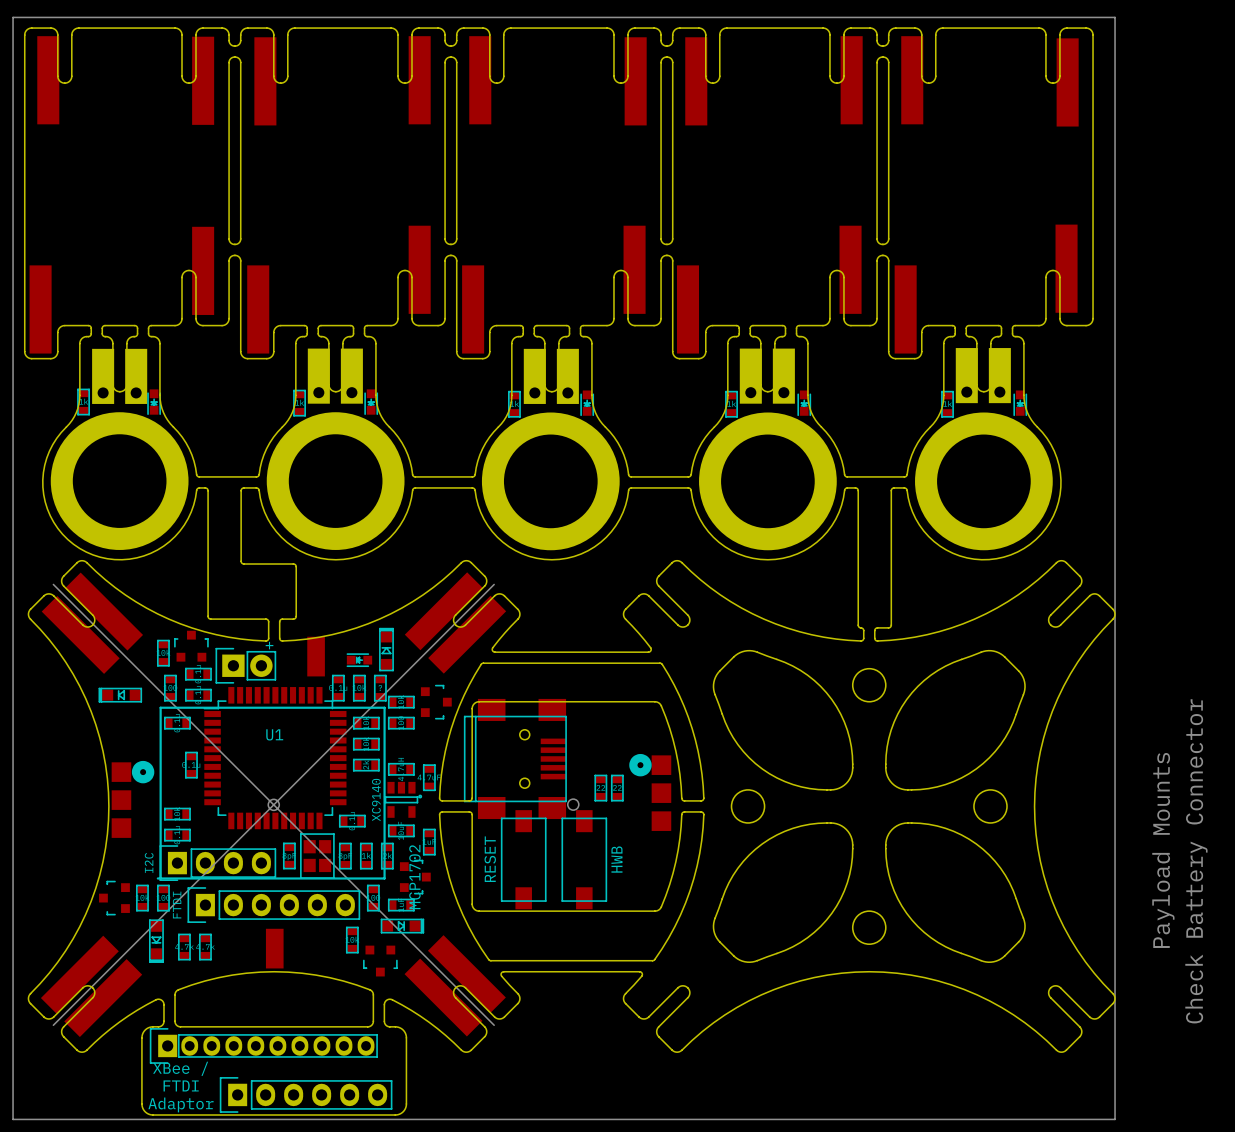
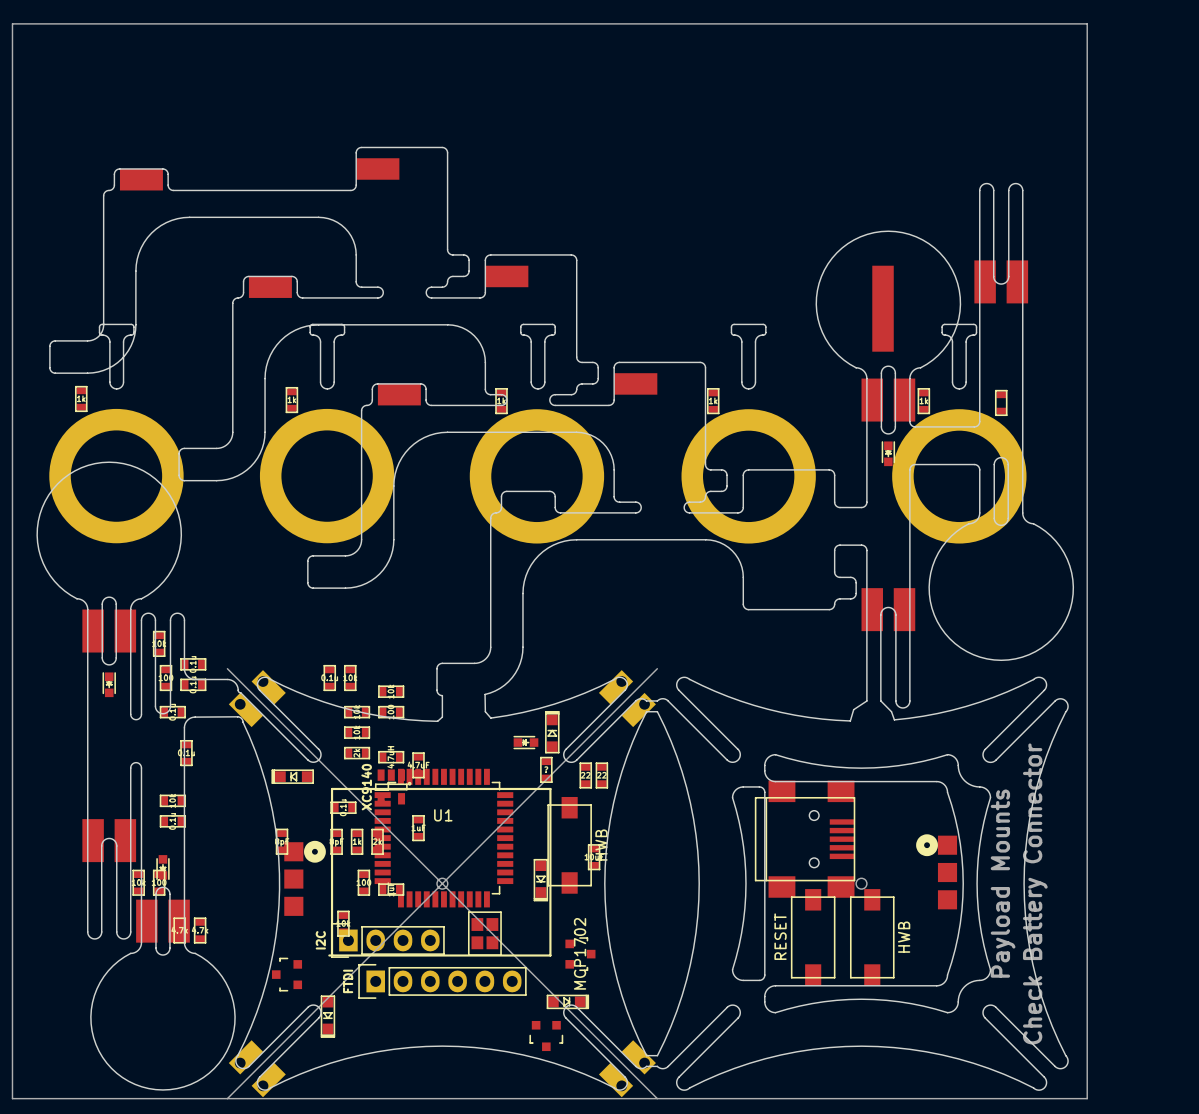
board edge: (31, 28) (51, 28) (56, 31) (57, 77) (60, 81) (64, 83) (71, 77) (71, 34) (74, 29) (78, 28) (178, 28) (181, 34) (182, 77) (184, 81) (189, 83) (195, 77) (196, 34) (198, 30) (202, 28) (225, 28) (228, 33) (229, 43) (234, 46) (240, 43) (241, 32) (245, 28) (271, 29) (273, 35) (273, 77) (276, 81) (280, 83) (287, 77) (287, 34) (289, 30) (294, 28) (394, 28) (397, 34) (398, 77) (400, 81) (404, 83) (411, 77) (412, 34) (418, 28) (441, 28) (444, 33) (445, 43) (450, 46) (455, 43) (457, 32) (461, 28) (487, 29) (489, 35) (489, 77) (492, 81) (496, 83) (503, 77) (503, 34) (509, 28) (610, 28) (613, 34) (614, 77) (616, 81) (620, 83) (627, 77) (628, 34) (634, 28) (657, 28) (660, 33) (661, 43) (666, 46) (671, 43) (673, 32) (677, 28) (703, 29) (705, 35) (705, 77) (708, 81) (712, 83) (719, 77) (719, 34) (725, 28) (826, 28) (829, 34) (830, 77) (832, 81) (836, 83) (843, 77) (844, 34) (849, 28) (873, 28) (876, 33) (877, 43) (882, 46) (887, 43) (889, 32) (893, 28) (919, 29) (921, 35) (921, 77) (923, 81) (928, 83) (935, 77) (935, 34) (940, 28) (1041, 28) (1045, 34) (1046, 77) (1052, 83) (1057, 81) (1059, 77) (1061, 30) (1066, 28) (1086, 28) (1090, 30) (1093, 35) (1092, 320) (1086, 325) (1066, 325) (1061, 322) (1059, 276) (1057, 271) (1052, 270) (1046, 276) (1044, 322) (1039, 325) (1014, 325) (1012, 327) (1013, 335) (1020, 337) (1023, 342) (1023, 395) (1025, 408) (1031, 420) (1050, 444) (1059, 465) (1060, 487) (1056, 509) (1041, 534) (1024, 548) (996, 558) (974, 559) (952, 553) (934, 541) (915, 518) (906, 488) (892, 488) (891, 625) (888, 627) (875, 628) (874, 638) (877, 641) (914, 637) (939, 631) (974, 619) (1018, 594) (1060, 560) (1065, 562) (1079, 576) (1081, 582) (1050, 615) (1048, 620) (1050, 625) (1054, 626) (1059, 625) (1092, 594) (1098, 595) (1113, 610) (1113, 618) (1094, 639) (1070, 673) (1052, 711) (1040, 751) (1034, 806) (1040, 861) (1052, 901) (1077, 950) (1113, 994) (1114, 999) (1112, 1003) (1098, 1017) (1092, 1018) (1059, 987) (1054, 985) (1050, 987) (1048, 991) (1050, 997) (1081, 1030) (1079, 1036) (1065, 1050) (1060, 1052) (1013, 1014) (964, 989) (924, 977) (896, 973) (841, 973) (800, 980) (761, 994) (724, 1014) (677, 1052) (672, 1050) (658, 1036) (656, 1030) (688, 996) (689, 991) (685, 986) (678, 987) (648, 1016) (643, 1018) (625, 1003) (623, 998) (625, 994) (641, 976) (640, 971) (503, 971) (501, 976) (518, 994) (519, 998) (518, 1002) (502, 1018) (495, 1017) (464, 986) (457, 986) (454, 990) (455, 997) (486, 1029) (485, 1036) (467, 1051) (461, 1050) (437, 1028) (411, 1010) (391, 999) (385, 1001) (385, 1024) (388, 1026) (400, 1028) (406, 1036) (406, 1105) (399, 1114) (152, 1115) (145, 1111) (141, 1103) (142, 1036) (147, 1028) (159, 1026) (163, 1024) (162, 1000) (156, 999) (137, 1010) (82, 1052) (77, 1050) (63, 1036) (61, 1030) (93, 997) (94, 991) (92, 987) (87, 985) (83, 987) (49, 1018) (43, 1016) (28, 1000) (30, 994) (65, 950) (91, 901) (105, 847) (108, 806) (103, 751) (91, 711) (65, 662) (30, 618) (28, 612) (43, 595) (49, 593) (83, 625) (87, 627) (92, 625) (94, 620) (93, 615) (61, 582) (63, 576) (77, 562) (82, 560) (135, 601) (157, 613) (192, 628) (228, 637) (266, 641) (268, 638) (268, 621) (266, 619) (210, 619) (208, 617) (206, 488) (197, 489) (188, 518) (169, 541) (150, 553) (129, 559) (107, 558) (79, 548) (62, 534) (47, 509) (42, 487) (44, 465) (52, 444) (72, 420) (77, 408) (79, 395) (79, 342) (83, 337) (90, 335) (91, 328) (88, 325) (60, 327) (57, 331) (57, 353) (53, 358) (30, 358) (25, 354) (24, 35) (26, 30) (31, 28) -> none
board edge: (234, 57) (239, 58) (240, 62) (240, 238) (239, 242) (235, 244) (230, 242) (229, 238) (229, 62) (230, 58) (234, 57) -> none
board edge: (450, 57) (455, 58) (456, 62) (456, 238) (455, 242) (451, 244) (446, 242) (445, 238) (445, 62) (446, 58) (450, 57) -> none
board edge: (666, 57) (671, 58) (672, 62) (672, 238) (671, 242) (667, 244) (662, 242) (661, 238) (661, 62) (662, 58) (666, 57) -> none
board edge: (882, 57) (887, 58) (888, 62) (888, 238) (887, 242) (883, 244) (878, 242) (877, 238) (877, 62) (878, 58) (882, 57) -> none
part: (48, 80) -> none
part: (203, 80) -> none
part: (419, 80) -> none
part: (480, 80) -> none
part: (851, 80) -> none
part: (912, 80) -> none
part: (265, 81) -> none
part: (635, 81) -> none
part: (696, 81) -> none
part: (1067, 82) -> none
part: none -> (377, 168)
part: none -> (141, 179)
board edge: (234, 255) (238, 256) (240, 260) (240, 351) (242, 356) (247, 358) (271, 357) (273, 352) (274, 330) (278, 326) (305, 325) (307, 334) (298, 338) (295, 342) (295, 395) (293, 408) (288, 420) (266, 448) (258, 475) (199, 476) (196, 475) (189, 448) (167, 420) (161, 408) (159, 395) (159, 342) (156, 337) (149, 335) (148, 327) (150, 325) (175, 325) (180, 322) (182, 276) (184, 271) (189, 270) (193, 271) (195, 276) (197, 322) (202, 325) (226, 324) (229, 318) (229, 260) (234, 255) -> none
board edge: (450, 255) (454, 256) (456, 260) (456, 351) (458, 356) (463, 358) (487, 357) (489, 352) (490, 330) (494, 326) (521, 325) (523, 334) (514, 338) (511, 342) (511, 395) (509, 408) (504, 420) (482, 448) (474, 475) (415, 476) (412, 475) (405, 448) (383, 420) (377, 408) (375, 395) (375, 342) (372, 337) (365, 335) (364, 327) (366, 325) (391, 325) (396, 322) (398, 276) (400, 271) (404, 270) (409, 271) (411, 276) (413, 322) (418, 325) (442, 324) (445, 318) (445, 260) (450, 255) -> none
board edge: (666, 255) (670, 256) (672, 260) (672, 351) (674, 356) (679, 358) (703, 357) (705, 352) (706, 330) (710, 326) (737, 325) (739, 334) (730, 338) (727, 342) (727, 395) (725, 408) (720, 420) (698, 448) (690, 475) (631, 476) (628, 475) (621, 448) (599, 420) (593, 408) (591, 395) (591, 342) (588, 337) (581, 335) (580, 327) (582, 325) (607, 325) (612, 322) (614, 276) (616, 271) (620, 270) (625, 271) (627, 276) (629, 322) (634, 325) (658, 324) (661, 318) (661, 260) (666, 255) -> none
board edge: (882, 255) (886, 256) (888, 260) (888, 351) (890, 356) (895, 358) (919, 357) (921, 352) (922, 330) (926, 326) (953, 325) (955, 334) (946, 338) (943, 342) (943, 395) (941, 408) (936, 420) (914, 448) (906, 475) (846, 476) (844, 475) (837, 448) (815, 420) (809, 408) (807, 395) (807, 342) (804, 337) (797, 335) (796, 327) (798, 325) (823, 325) (828, 322) (830, 276) (832, 271) (836, 270) (841, 271) (843, 276) (845, 322) (850, 325) (874, 324) (877, 318) (877, 260) (882, 255) -> none
part: (1066, 268) -> none
part: (419, 269) -> none
part: (634, 269) -> none
part: (850, 269) -> none
part: (203, 270) -> none
part: none -> (506, 276)
part: none -> (1001, 281)
part: none -> (270, 287)
part: (40, 309) -> none
part: (258, 309) -> none
part: (473, 309) -> none
part: (688, 309) -> none
board edge: none -> (881, 373) (881, 427) (884, 432) (889, 433) (895, 427) (895, 372) (892, 367) (887, 366) (883, 368) (881, 373)
part: (983, 375) -> none
part: (119, 376) -> none
part: (335, 376) -> none
part: (551, 376) -> none
part: (767, 376) -> none
part: none -> (635, 383)
part footprint: [1013, 390, 1028, 417] -> [994, 389, 1008, 417]
part: none -> (399, 394)
part: (154, 402) -> none
part: (371, 402) -> none
part: (587, 403) -> none
part rotation: 0° (804, 403) -> 180° (888, 453)
part position: (804, 403) -> (888, 453)
part: none -> (888, 400)
board edge: none -> (994, 464) (994, 519) (996, 523) (1002, 525) (1008, 519) (1008, 463) (1005, 459) (1000, 457) (996, 459) (994, 464)
board edge: (243, 487) (258, 488) (267, 519) (287, 542) (306, 553) (335, 559) (365, 553) (390, 537) (403, 519) (412, 489) (415, 487) (473, 488) (483, 519) (497, 537) (522, 553) (551, 559) (581, 553) (606, 537) (619, 519) (630, 488) (689, 488) (699, 519) (713, 537) (738, 553) (767, 559) (797, 553) (816, 542) (835, 519) (845, 489) (856, 488) (858, 490) (858, 625) (863, 629) (863, 638) (860, 641) (823, 637) (799, 631) (763, 619) (720, 594) (677, 560) (672, 562) (658, 576) (656, 582) (688, 615) (689, 620) (687, 625) (683, 626) (678, 625) (645, 594) (639, 595) (623, 611) (625, 618) (650, 648) (649, 651) (494, 652) (492, 648) (518, 618) (519, 611) (503, 595) (497, 594) (464, 625) (460, 627) (455, 625) (453, 620) (455, 615) (486, 582) (484, 576) (470, 562) (466, 560) (423, 594) (379, 619) (332, 634) (281, 640) (279, 638) (280, 620) (294, 619) (296, 616) (296, 566) (293, 564) (241, 562) (241, 490) (243, 487) -> none
board edge: none -> (979, 512) (979, 469) (977, 465) (915, 464) (910, 467) (909, 701) (903, 707) (898, 706) (896, 702) (895, 614) (892, 609) (888, 607) (883, 609) (880, 614) (880, 700) (891, 711) (894, 719) (908, 718) (965, 706) (1007, 691) (1036, 677) (1042, 678) (1046, 683) (1044, 689) (984, 750) (984, 758) (990, 762) (995, 760) (1055, 700) (1062, 699) (1067, 703) (1067, 709) (1046, 756) (1032, 803) (1027, 835) (1024, 883) (1027, 932) (1032, 964) (1046, 1011) (1067, 1058) (1067, 1064) (1061, 1068) (1055, 1067) (994, 1006) (986, 1006) (983, 1012) (985, 1018) (1045, 1077) (1046, 1083) (1043, 1088) (1037, 1089) (988, 1068) (942, 1054) (894, 1047) (861, 1046) (813, 1049) (781, 1054) (734, 1068) (687, 1089) (680, 1089) (676, 1084) (678, 1077) (739, 1016) (739, 1008) (732, 1005) (727, 1007) (668, 1066) (662, 1068) (657, 1066) (637, 1067) (575, 1006) (571, 1005) (566, 1006) (563, 1011) (565, 1017) (626, 1078) (626, 1085) (620, 1090) (569, 1068) (538, 1058) (490, 1049) (442, 1046) (409, 1047) (361, 1054) (315, 1068) (267, 1089) (261, 1089) (257, 1084) (259, 1077) (319, 1016) (319, 1008) (313, 1005) (308, 1007) (249, 1066)
board edge: none -> (979, 512) (976, 520) (956, 531) (938, 552) (929, 579) (931, 608) (945, 633) (966, 651) (994, 659) (1022, 657) (1041, 647) (1057, 633) (1068, 614) (1073, 587) (1069, 565) (1060, 546) (1045, 531) (1026, 521) (1022, 514) (1022, 190) (1018, 184) (1012, 184) (1008, 189) (1008, 277) (1006, 281) (1002, 283) (996, 282) (993, 277) (993, 188) (990, 185) (985, 183) (979, 189) (979, 421) (978, 425) (915, 426) (910, 424) (910, 374) (914, 370) (926, 364) (938, 355) (951, 338) (958, 318) (959, 290) (948, 263) (928, 243) (902, 232) (881, 231) (867, 234) (847, 243) (832, 258) (819, 283) (816, 304) (819, 325) (829, 344) (844, 360) (862, 370) (866, 375) (866, 504) (861, 507) (836, 505) (834, 474) (830, 470) (748, 469) (743, 474) (743, 507) (741, 511) (689, 512) (684, 509) (686, 503) (702, 501) (708, 492) (723, 491) (726, 486) (725, 471) (709, 469) (705, 465) (705, 367) (703, 363) (618, 362) (614, 367) (614, 400) (611, 404) (555, 405) (550, 402) (550, 398) (553, 395) (573, 394) (579, 384) (594, 383) (598, 379) (596, 364) (580, 362) (576, 357) (576, 260) (574, 256) (489, 255) (485, 259) (485, 293) (482, 297) (431, 297) (427, 295) (426, 291) (428, 287) (444, 286) (450, 277) (465, 276) (469, 271) (467, 256) (451, 254) (447, 250) (447, 152) (444, 148) (359, 147) (356, 152) (356, 186) (350, 190) (172, 190) (168, 187) (167, 172) (164, 169) (117, 169) (114, 172) (113, 187) (105, 191) (103, 195) (103, 328) (98, 336) (91, 340) (51, 342) (49, 367) (53, 372) (98, 371) (113, 365) (125, 354) (133, 340) (135, 330) (135, 271) (138, 253) (151, 233) (161, 225) (177, 218) (318, 217) (332, 220) (345, 228) (353, 240) (355, 250) (357, 284) (361, 287) (379, 287) (383, 291) (382, 295) (378, 297) (301, 297) (297, 294) (297, 280) (293, 276) (245, 278) (242, 295) (234, 299) (232, 302) (232, 436) (228, 443) (220, 447) (181, 449) (179, 453) (179, 475) (181, 479) (227, 479) (242, 473) (254, 462) (262, 448) (264, 437) (265, 378) (268, 360) (280, 340) (290, 333) (306, 326) (447, 324) (462, 327) (474, 335) (482, 348) (485, 357) (486, 391) (490, 394) (502, 394) (506, 398) (506, 402) (502, 405) (431, 405) (426, 401) (425, 387) (422, 384) (373, 385) (371, 402) (363, 406) (361, 410) (361, 543) (356, 551) (349, 555) (309, 556) (307, 560) (307, 582) (310, 587) (356, 586) (371, 580) (383, 569) (391, 555) (393, 545) (393, 486) (396, 468) (409, 448) (418, 440) (435, 433) (576, 432) (590, 435) (603, 443) (611, 455) (613, 464) (615, 499) (619, 502) (637, 502) (640, 505) (640, 510) (636, 512) (559, 512) (555, 509) (555, 495) (551, 491) (503, 492) (500, 510) (492, 514) (490, 517) (490, 651) (486, 658) (478, 662) (442, 663) (438, 665) (437, 690) (442, 695) (442, 717) (437, 721) (394, 718) (365, 713) (310, 697) (267, 677) (259, 680) (257, 684) (259, 689) (318, 749)
line: (53, 584) (494, 1025) -> (227, 668) (657, 1098)
line: (494, 584) (53, 1025) -> (657, 668) (227, 1098)
board edge: none -> (102, 604) (102, 658) (104, 663) (110, 664) (116, 658) (116, 603) (113, 598) (108, 597) (104, 599) (102, 604)
part: none -> (888, 609)
part: (455, 622) -> none
part: (92, 623) -> none
part: none -> (109, 631)
part: (191, 646) -> none
part: (386, 649) -> none
board edge: (757, 652) (747, 650) (737, 653) (719, 670) (714, 679) (714, 692) (733, 737) (755, 763) (784, 781) (818, 789) (833, 789) (841, 786) (851, 776) (852, 755) (847, 730) (836, 706) (820, 686) (807, 675) (785, 662) (757, 652) -> none
board edge: (980, 652) (953, 662) (931, 675) (917, 686) (901, 706) (891, 730) (886, 755) (887, 776) (896, 786) (904, 789) (920, 789) (953, 781) (983, 763) (1005, 737) (1024, 692) (1023, 679) (1018, 670) (1000, 653) (991, 650) (980, 652) -> none
part: (316, 656) -> none
part: (359, 660) -> none
board edge: (483, 663) (661, 663) (679, 695) (692, 728) (700, 762) (703, 799) (684, 800) (682, 799) (678, 762) (673, 739) (661, 706) (658, 702) (479, 701) (474, 703) (472, 707) (471, 799) (469, 800) (440, 800) (441, 774) (451, 728) (464, 695) (483, 663) -> none
part: (245, 665) -> none
round board edge: [852, 668, 887, 703] -> none
part footprint: [98, 687, 143, 703] -> [102, 672, 116, 698]
part position: (380, 688) -> (546, 769)
board edge: none -> (689, 679) (727, 696) (767, 709) (808, 717) (850, 720)
board edge: none -> (689, 679) (684, 677) (678, 679) (676, 684) (678, 689) (738, 749)
part: (436, 702) -> none
board edge: none -> (485, 694) (485, 711) (490, 718) (554, 704) (584, 693) (616, 677) (624, 678) (627, 683) (625, 689) (564, 750) (564, 758) (571, 762) (576, 760) (637, 699) (657, 700) (662, 698) (668, 700)
board edge: none -> (485, 694) (504, 685) (518, 668) (522, 652) (522, 593) (525, 575) (538, 555) (558, 542) (576, 539) (705, 539) (720, 542) (732, 550) (740, 562) (742, 572) (743, 604) (748, 609) (829, 609) (833, 607) (837, 599) (853, 598) (856, 594) (855, 579) (851, 577) (838, 577) (835, 574) (834, 549) (839, 545) (862, 545) (866, 550) (866, 700) (853, 709) (850, 720)
part: none -> (257, 698)
part: none -> (627, 698)
board edge: none -> (668, 701) (727, 760)
board edge: none -> (657, 711) (646, 711) (621, 771) (610, 819) (604, 883) (607, 932) (621, 995) (646, 1055) (657, 1055)
board edge: none -> (657, 711) (676, 756) (686, 787) (696, 835) (699, 883) (696, 932) (686, 980) (676, 1011) (657, 1055)
part: none -> (552, 732)
part: none -> (525, 742)
U1 position: (274, 758) -> (443, 838)
part: (515, 758) -> none
board edge: none -> (318, 749) (321, 754) (318, 760) (313, 762) (308, 760)
board edge: none -> (738, 749) (740, 754) (738, 760) (732, 762) (727, 760)
board edge: none -> (775, 754) (767, 757) (764, 765) (766, 776) (774, 781) (936, 781) (943, 783) (947, 789) (958, 830) (962, 870) (962, 896) (955, 949) (946, 979) (942, 984) (774, 985) (769, 988) (765, 993) (767, 1008) (775, 1012) (824, 1001) (861, 999) (898, 1001) (947, 1012) (954, 1010) (964, 986) (971, 982) (985, 978) (990, 971) (979, 921) (977, 883) (979, 846) (990, 797) (988, 791) (964, 780) (959, 773) (956, 760) (948, 754) (898, 765) (861, 768) (811, 763) (775, 754)
board edge: none -> (308, 760) (238, 692) (233, 681) (227, 679) (193, 679) (187, 676) (184, 668) (184, 619) (179, 613) (173, 614) (170, 619) (170, 707) (168, 711) (163, 713) (158, 712) (155, 707) (155, 618) (149, 613) (142, 617) (141, 715) (137, 719) (131, 717) (131, 606) (134, 601) (147, 595) (158, 586) (172, 569) (180, 542) (178, 514) (173, 501) (160, 483) (149, 474) (130, 465) (116, 462) (95, 463) (81, 467) (63, 478) (53, 489) (42, 507) (37, 535) (40, 556) (50, 575) (64, 591) (83, 601) (87, 608) (87, 931) (92, 938) (98, 937) (101, 932) (101, 845) (103, 840) (108, 838) (113, 840) (116, 845) (117, 933) (123, 938) (130, 933) (130, 767) (132, 763) (136, 762) (141, 768) (141, 944) (137, 951) (124, 956) (113, 965) (100, 982) (91, 1009) (93, 1037) (102, 1057) (116, 1073) (135, 1084) (155, 1089) (184, 1086) (203, 1077) (219, 1063) (229, 1044) (235, 1016) (229, 988) (212, 965) (201, 956) (188, 951) (184, 944) (184, 727) (186, 721) (192, 717) (238, 716) (242, 719) (255, 751) (269, 796) (275, 826) (279, 873) (277, 920) (270, 967) (256, 1012) (235, 1060) (236, 1064) (240, 1068) (249, 1066)
part: none -> (292, 776)
round board edge: [730, 789, 766, 824] -> none
round board edge: [973, 789, 1008, 824] -> none
part: (650, 792) -> none
drawing: [267, 798, 280, 811] -> none
drawing: [567, 798, 580, 811] -> none
part position: (132, 799) -> (305, 878)
board edge: none -> (743, 786) (760, 787) (764, 791) (764, 975) (760, 980) (740, 980) (735, 977) (732, 971) (743, 921) (745, 883) (743, 846) (732, 797) (735, 790) (743, 786)
board edge: (442, 811) (469, 811) (471, 813) (472, 905) (474, 909) (479, 911) (657, 910) (661, 906) (673, 873) (678, 850) (682, 813) (701, 811) (703, 814) (699, 853) (690, 890) (674, 926) (654, 960) (490, 960) (468, 926) (453, 890) (441, 840) (439, 814) (442, 811) -> none
board edge: (826, 822) (836, 823) (844, 827) (849, 833) (852, 842) (849, 874) (836, 906) (820, 926) (792, 946) (755, 961) (744, 961) (737, 958) (718, 940) (713, 928) (722, 898) (733, 875) (755, 849) (777, 834) (801, 826) (826, 822) -> none
board edge: (907, 822) (937, 826) (961, 834) (983, 849) (1000, 868) (1013, 890) (1025, 925) (1020, 940) (1000, 958) (991, 962) (983, 961) (945, 946) (924, 932) (906, 913) (891, 882) (887, 865) (885, 845) (887, 836) (892, 829) (899, 824) (907, 822) -> none
part rotation: 0° (401, 830) -> 90° clockwise (594, 857)
part position: (401, 830) -> (594, 857)
text position: Payload Mounts (1163, 850) -> Payload Mounts (1003, 883)
part: none -> (805, 839)
part: none -> (109, 840)
part position: (317, 856) -> (484, 933)
part: RESET (523, 859) -> none
text position: Check Battery Connector (1196, 861) -> Check Battery Connector (1035, 893)
part position: (217, 863) -> (387, 940)
part position: (415, 877) -> (580, 954)
line: (157, 878) (384, 878) (384, 707) (160, 707) (160, 878) -> (329, 955) (550, 955) (550, 788) (332, 788) (332, 955)
part: none -> (162, 867)
part: none -> (936, 871)
drawing: none -> [436, 877, 449, 890]
drawing: none -> [855, 877, 868, 890]
part: none -> (540, 880)
part: (114, 898) -> none
part position: (273, 905) -> (442, 981)
board edge: none -> (155, 894) (156, 948) (158, 953) (163, 954) (169, 948) (169, 893) (167, 888) (162, 887) (158, 889) (155, 894)
round board edge: [852, 910, 887, 945] -> none
part: (402, 926) -> none
part: none -> (162, 921)
part: (156, 941) -> none
part: (274, 948) -> none
part: none -> RESET (813, 937)
part: none -> HWB (872, 937)
part rotation: 0° (380, 961) -> 90° clockwise (287, 974)
part position: (380, 961) -> (287, 974)
part: (455, 985) -> none
part: (91, 986) -> none
board edge: (178, 989) (175, 994) (175, 1021) (179, 1026) (367, 1026) (373, 1022) (373, 994) (371, 990) (343, 980) (315, 975) (288, 972) (246, 973) (218, 977) (178, 989) -> none
part: none -> (567, 1001)
part: none -> (327, 1016)
part: (263, 1045) -> none
part: none -> (546, 1036)
text: XBee / (180, 1068) -> none
text: FTDI (181, 1085) -> none
part: none -> (257, 1068)
part: none -> (627, 1068)
part: (306, 1094) -> none
text: Adaptor (181, 1104) -> none

